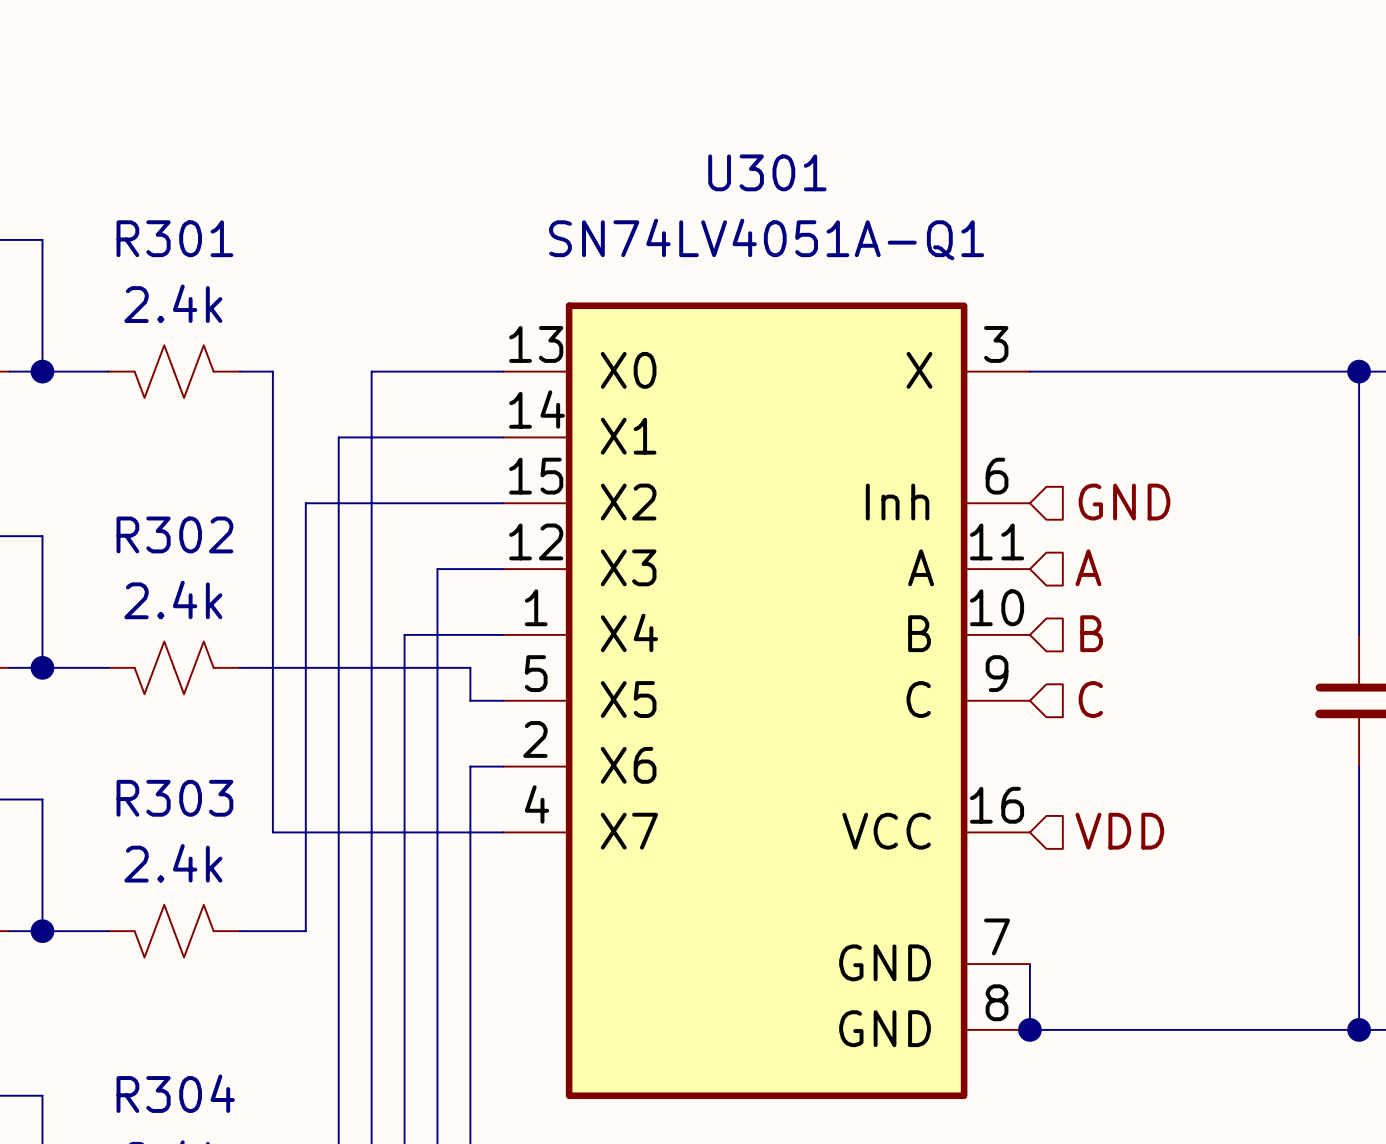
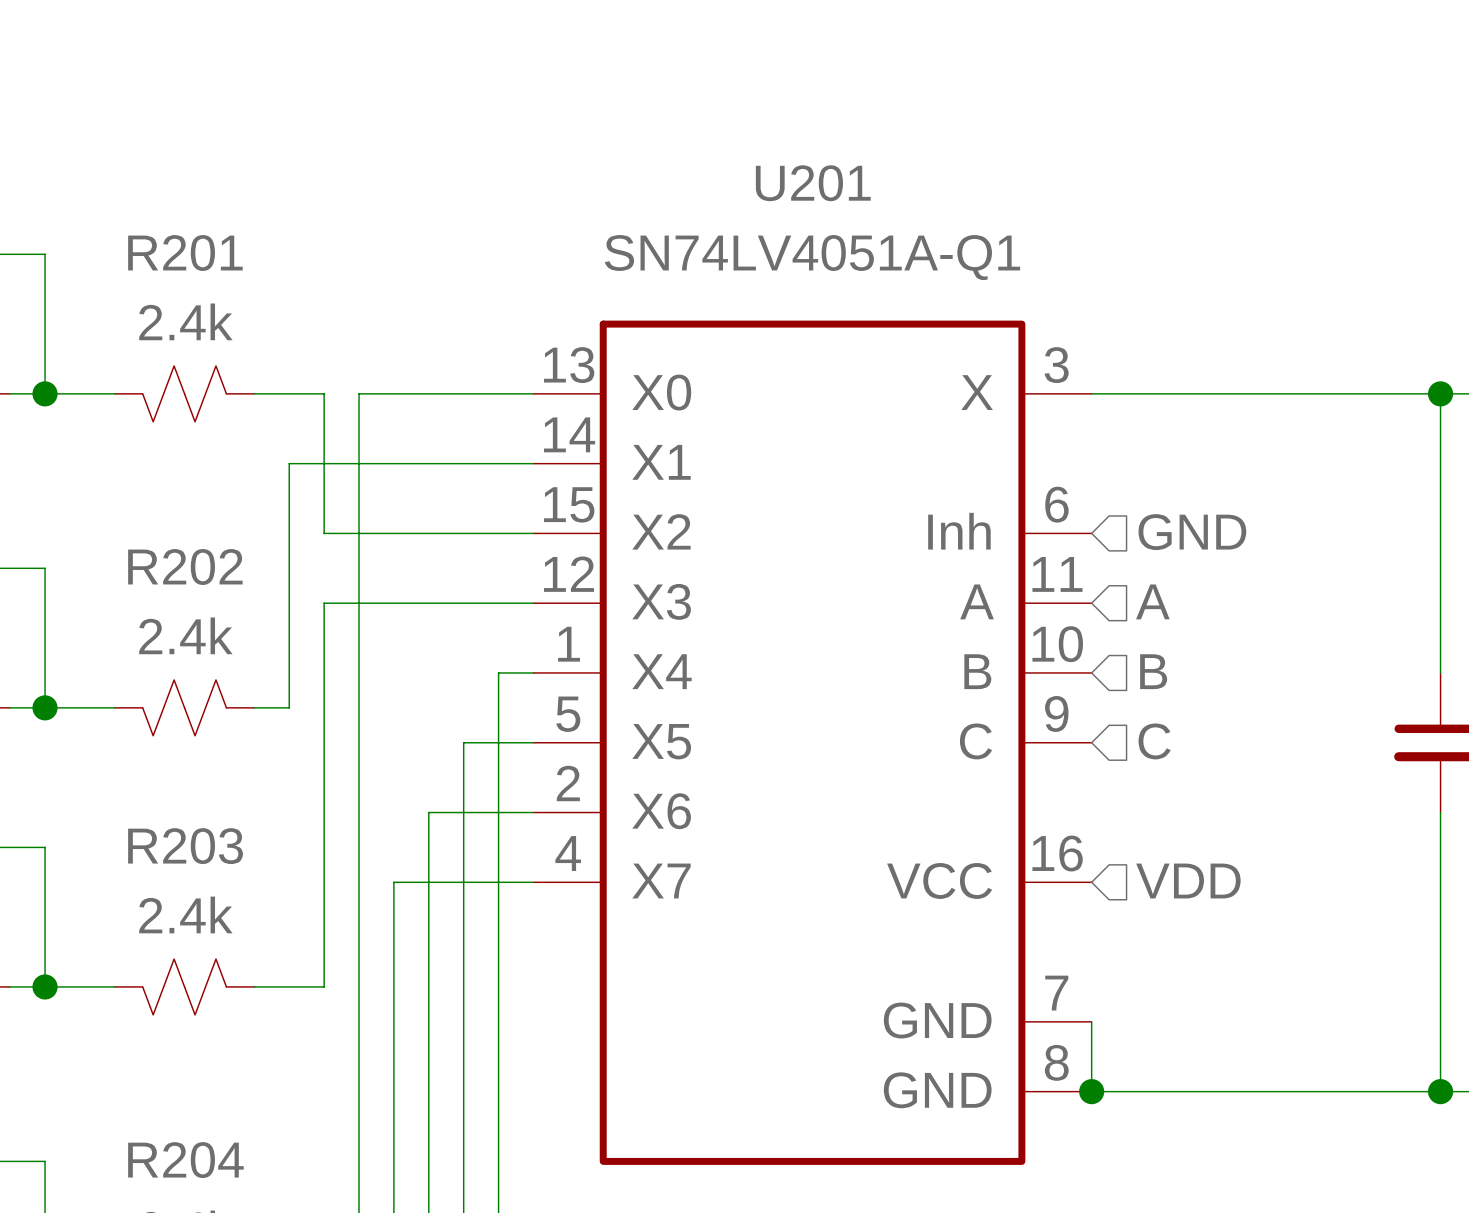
U301 name: U301 (767, 172) -> U201 (813, 183)
R301 name: R301 (174, 238) -> R201 (185, 253)
wire: (272, 371) (272, 437) -> (289, 393) (324, 393) (324, 533)
wire: (371, 371) (371, 832) (272, 832) (272, 667) (470, 667) -> (498, 672) (498, 707)
wire: none -> (393, 393) (359, 393) (359, 463) (289, 463)
wire: (305, 503) (305, 569) -> (463, 603) (324, 603)
R302 name: R302 (174, 534) -> R202 (185, 567)
wire: (437, 569) (437, 700) -> none
wire: (470, 634) (404, 634) (404, 766) -> (463, 742) (498, 742) (498, 812) (428, 812)
R303 name: R303 (174, 798) -> R203 (185, 846)
R304 name: R304 (175, 1093) -> R204 (185, 1160)

